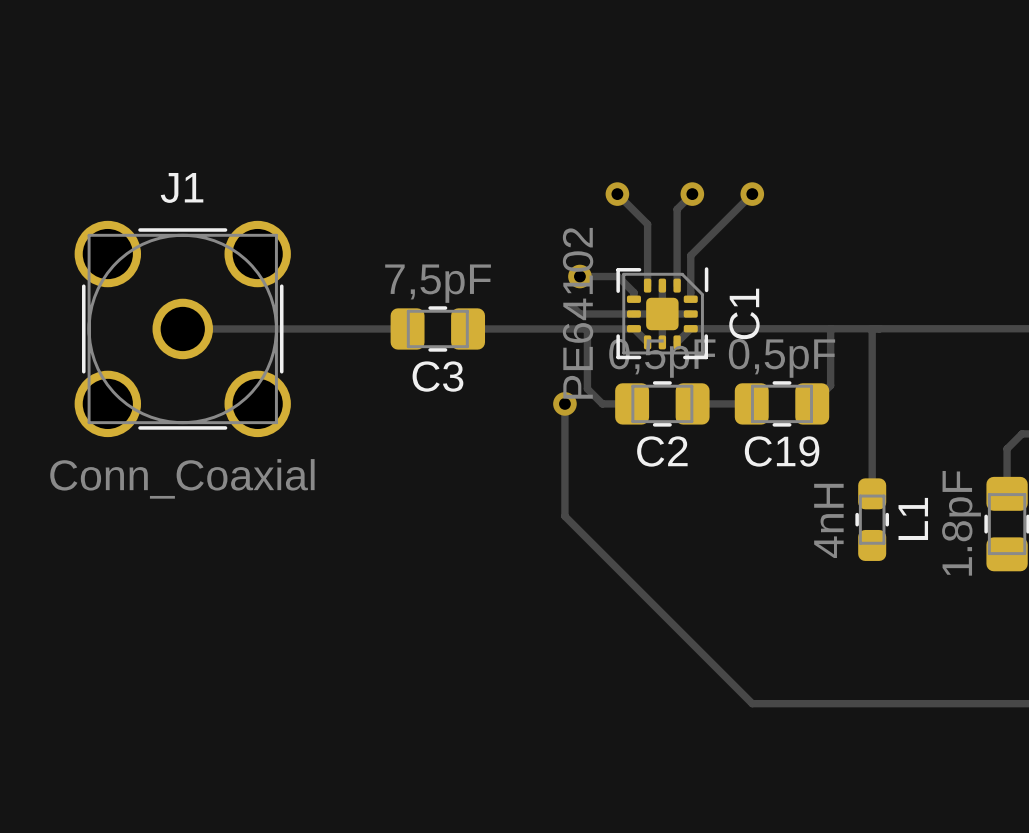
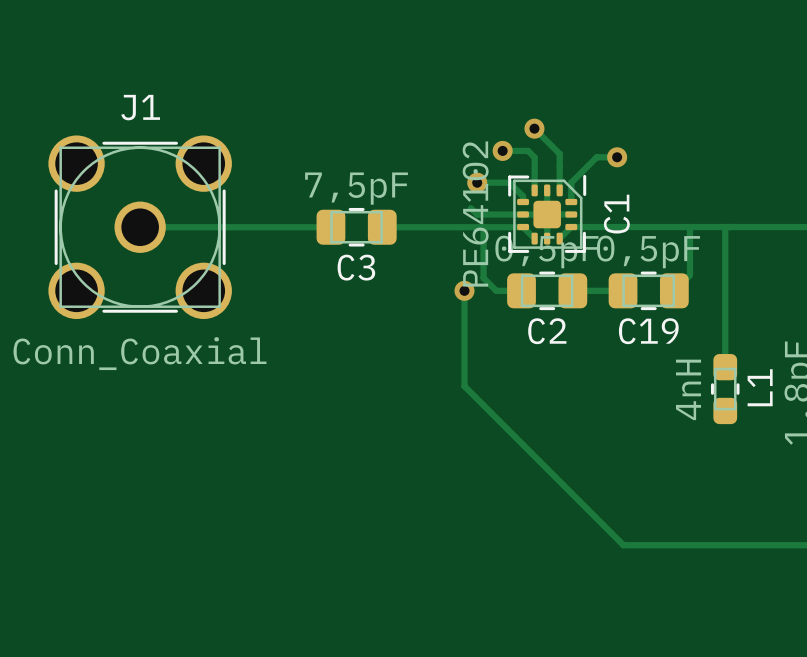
track: (617, 194) (647, 224) (647, 246) -> (502, 150) (528, 150) (534, 157)
via: (617, 194) -> none
track: (692, 194) (677, 209) (677, 242) -> (534, 128) (559, 153)
via: (692, 194) -> none
track: (752, 194) (690, 255) (690, 276) -> (617, 157) (596, 157) (571, 182)
via: (752, 194) -> none
via: none -> (534, 128)
via: none -> (502, 150)
via: none -> (617, 157)

